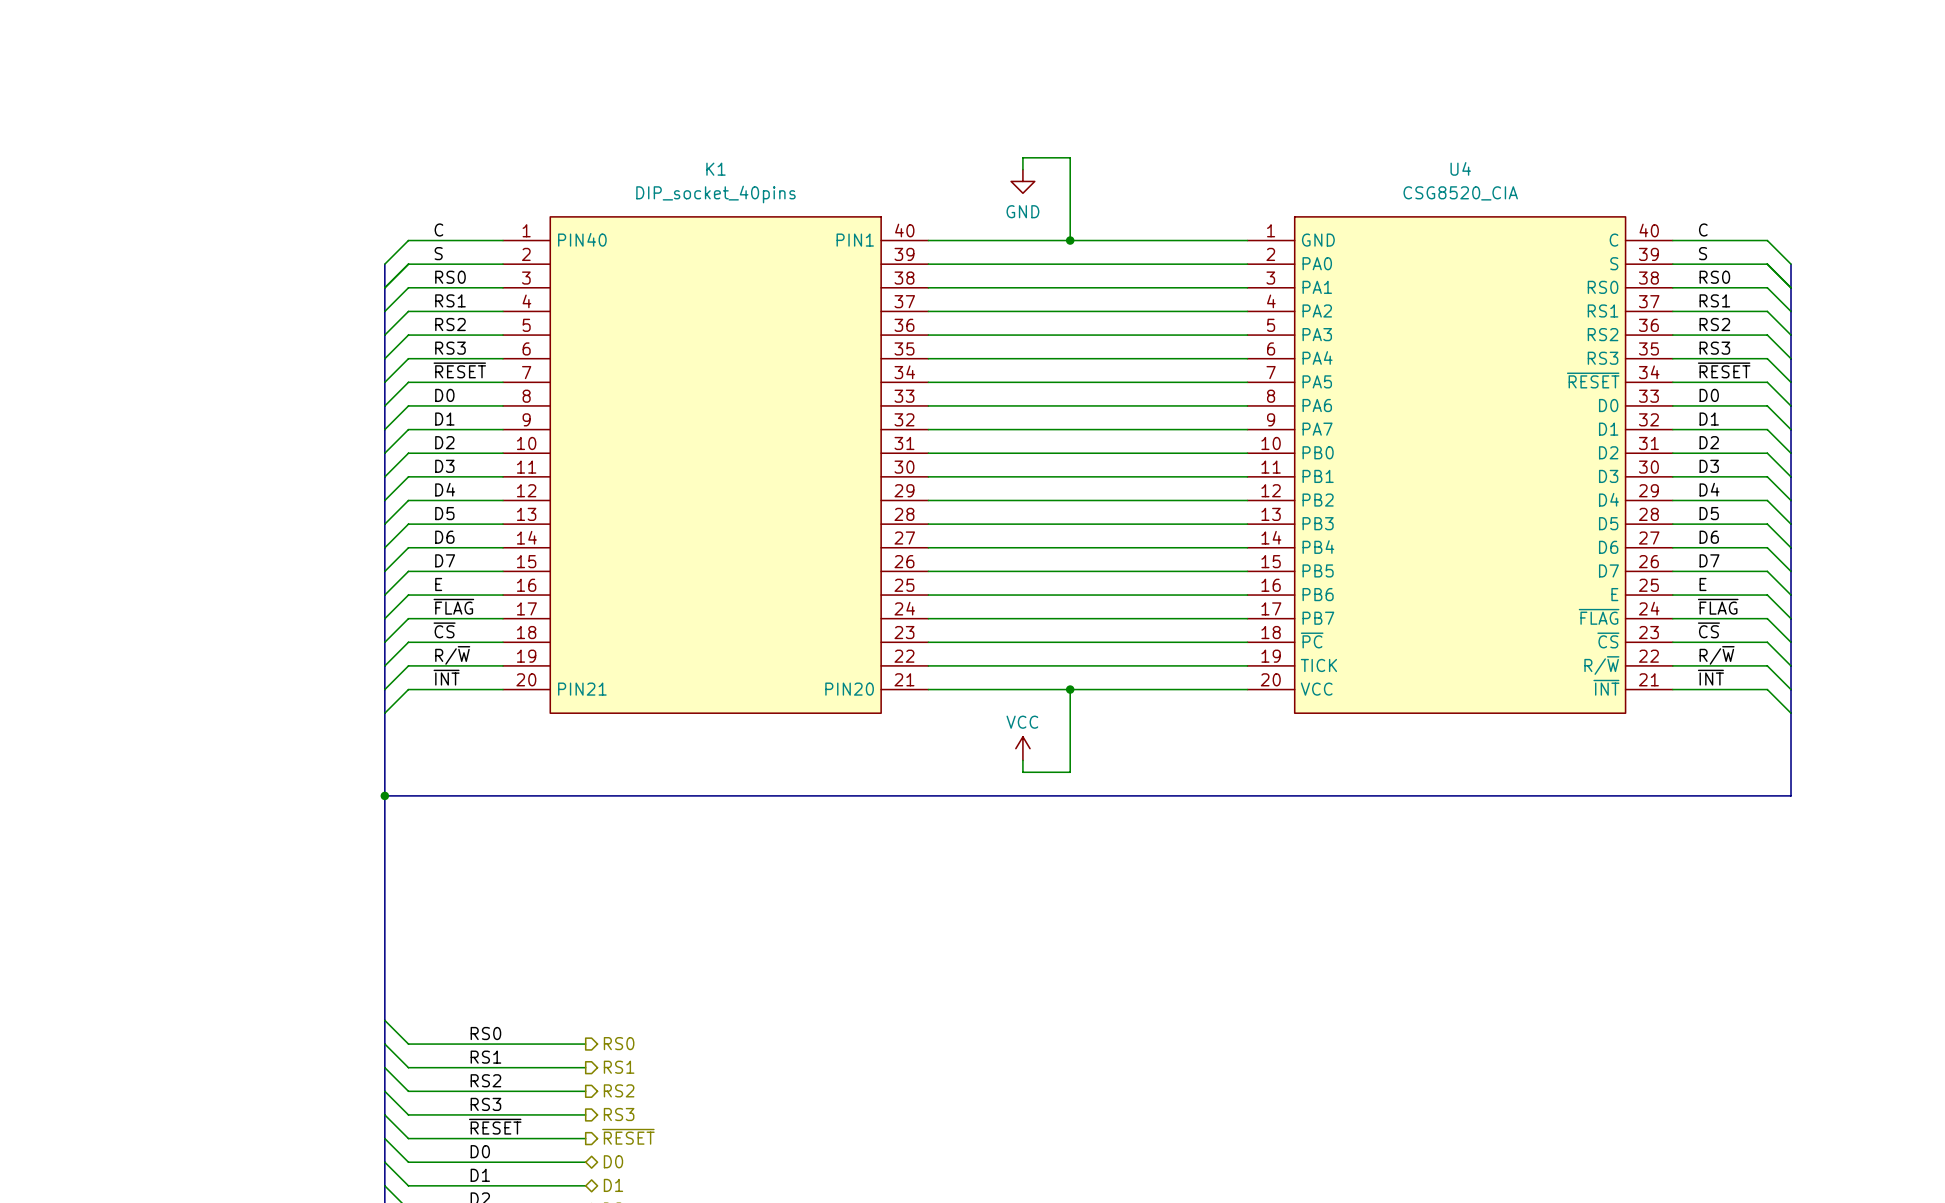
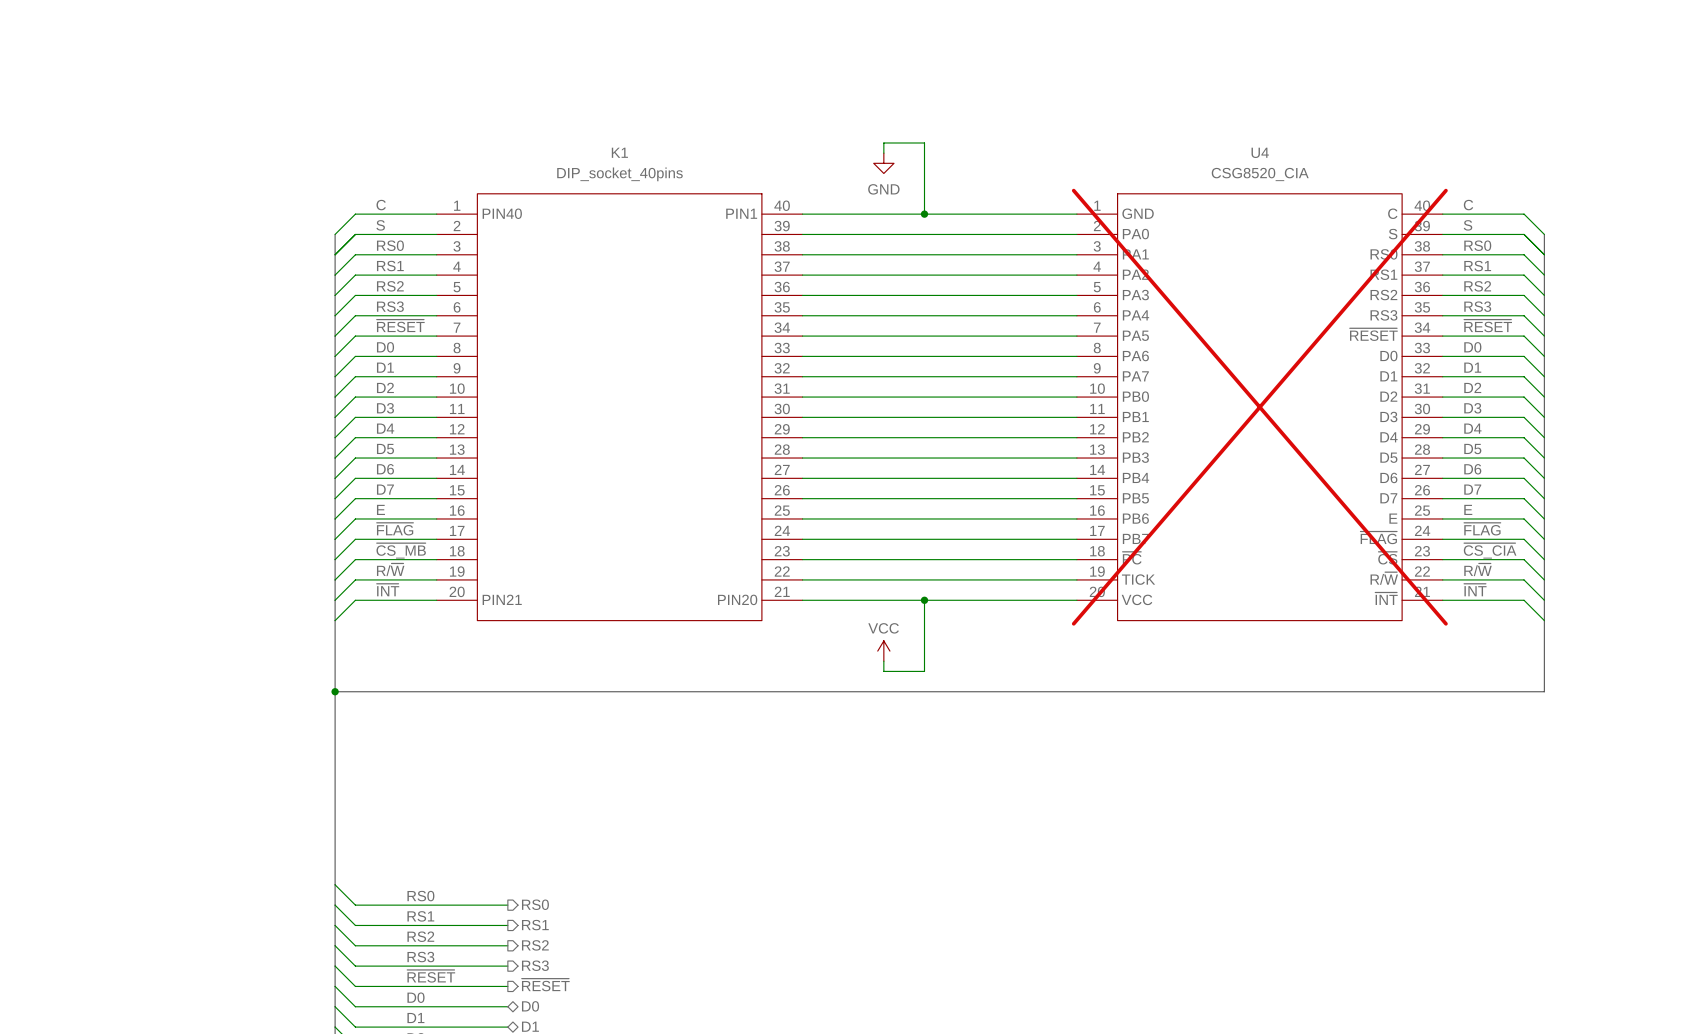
U4 do-not-place cross: none -> (1259, 407)
label: ~{CS} (444, 630) -> ~{CS_MB} (401, 550)
label: ~{CS} (1708, 630) -> ~{CS_CIA} (1490, 550)

